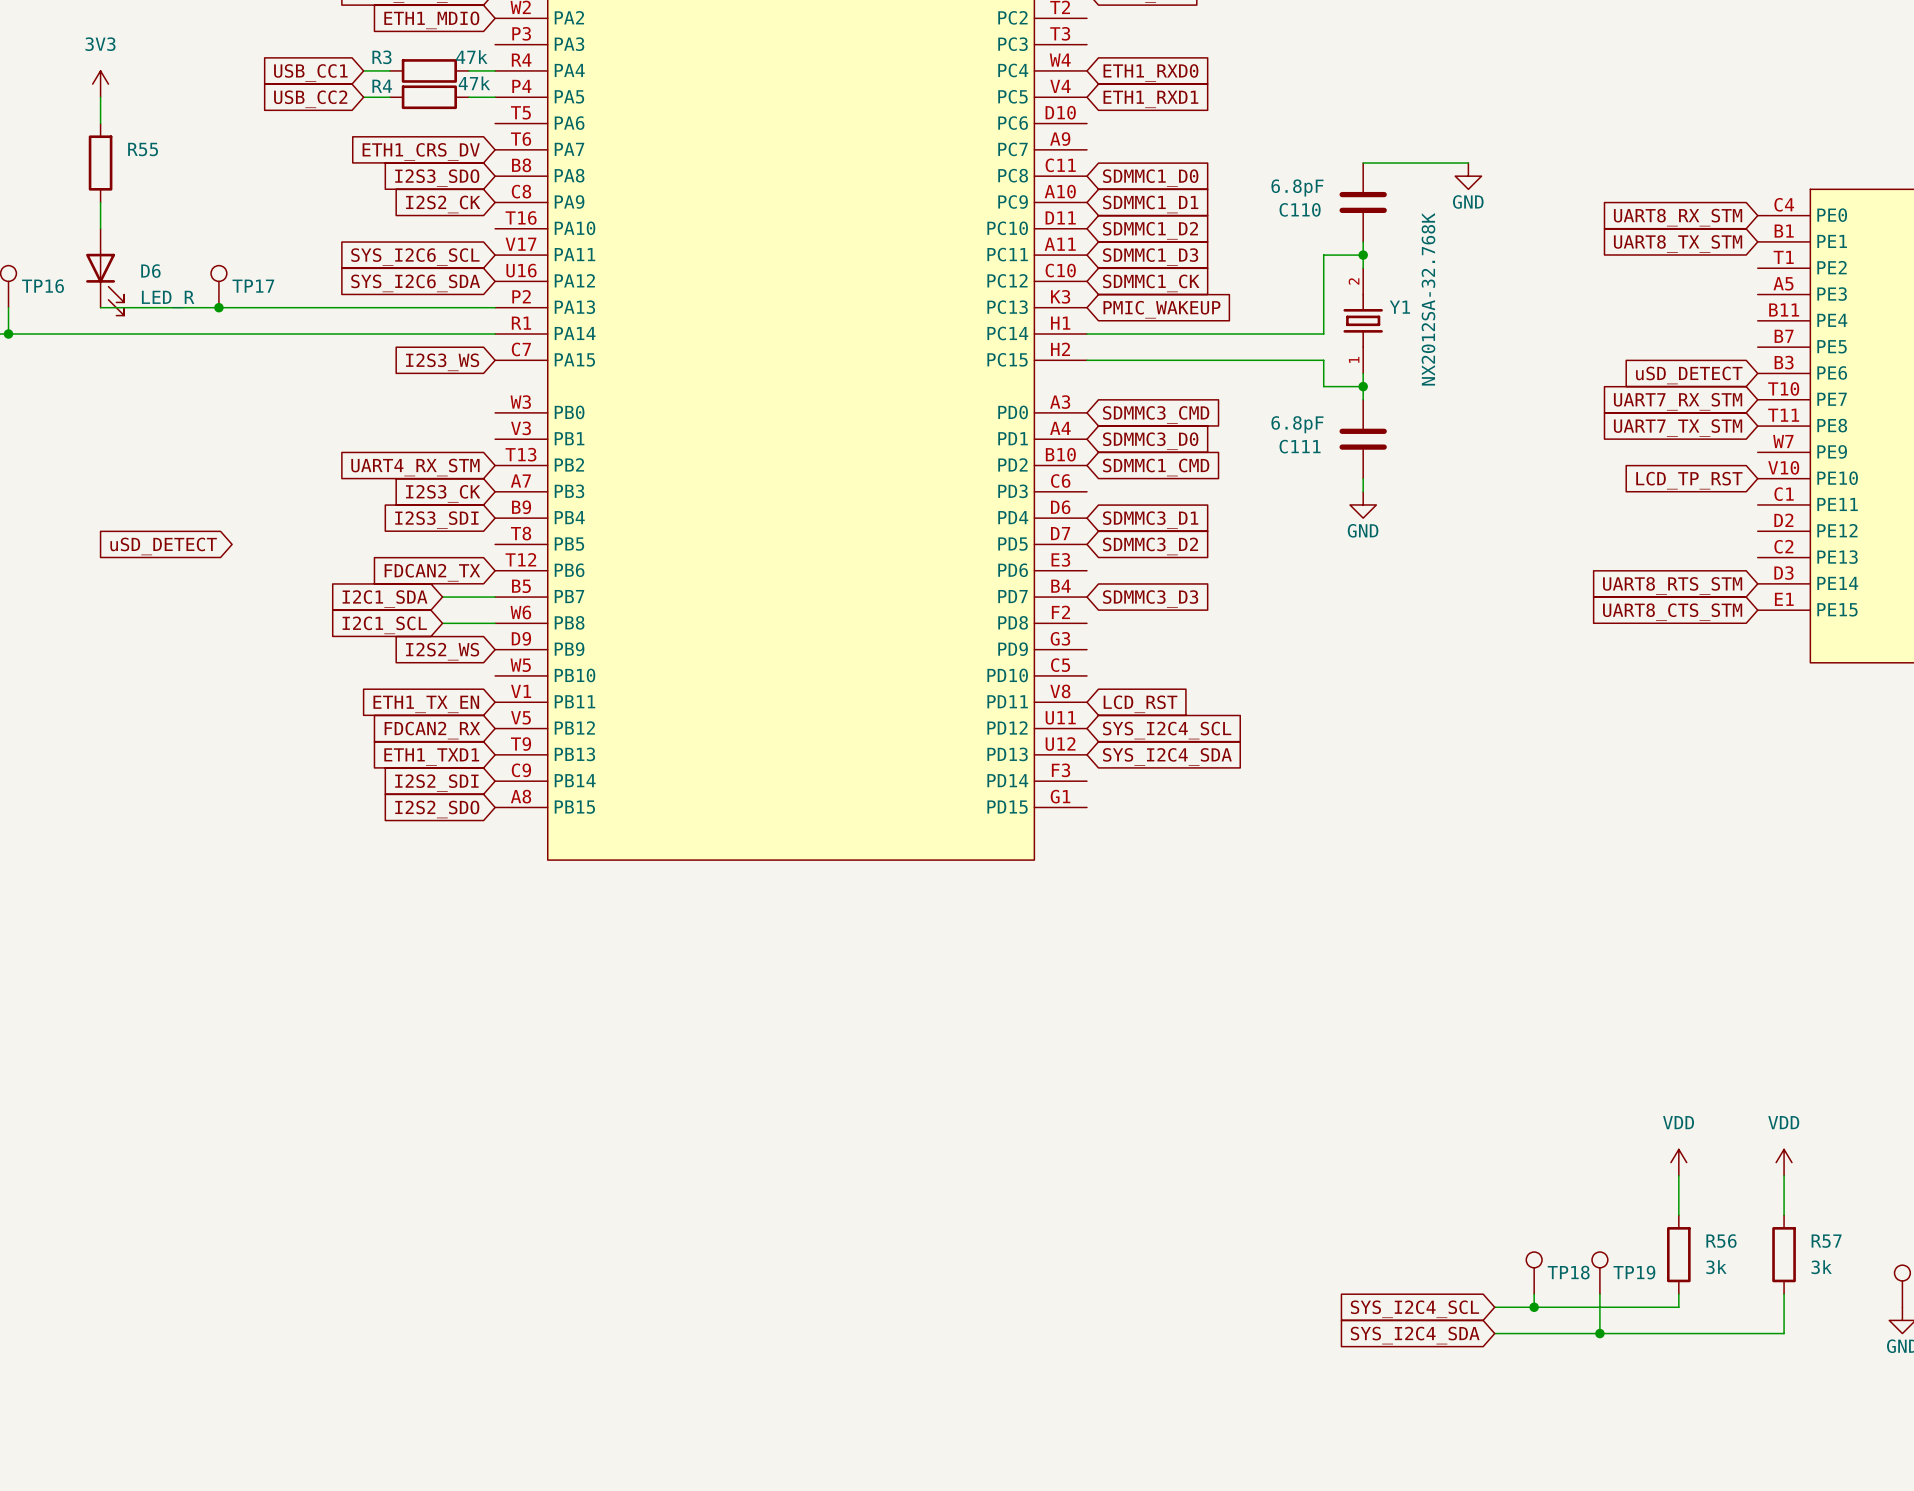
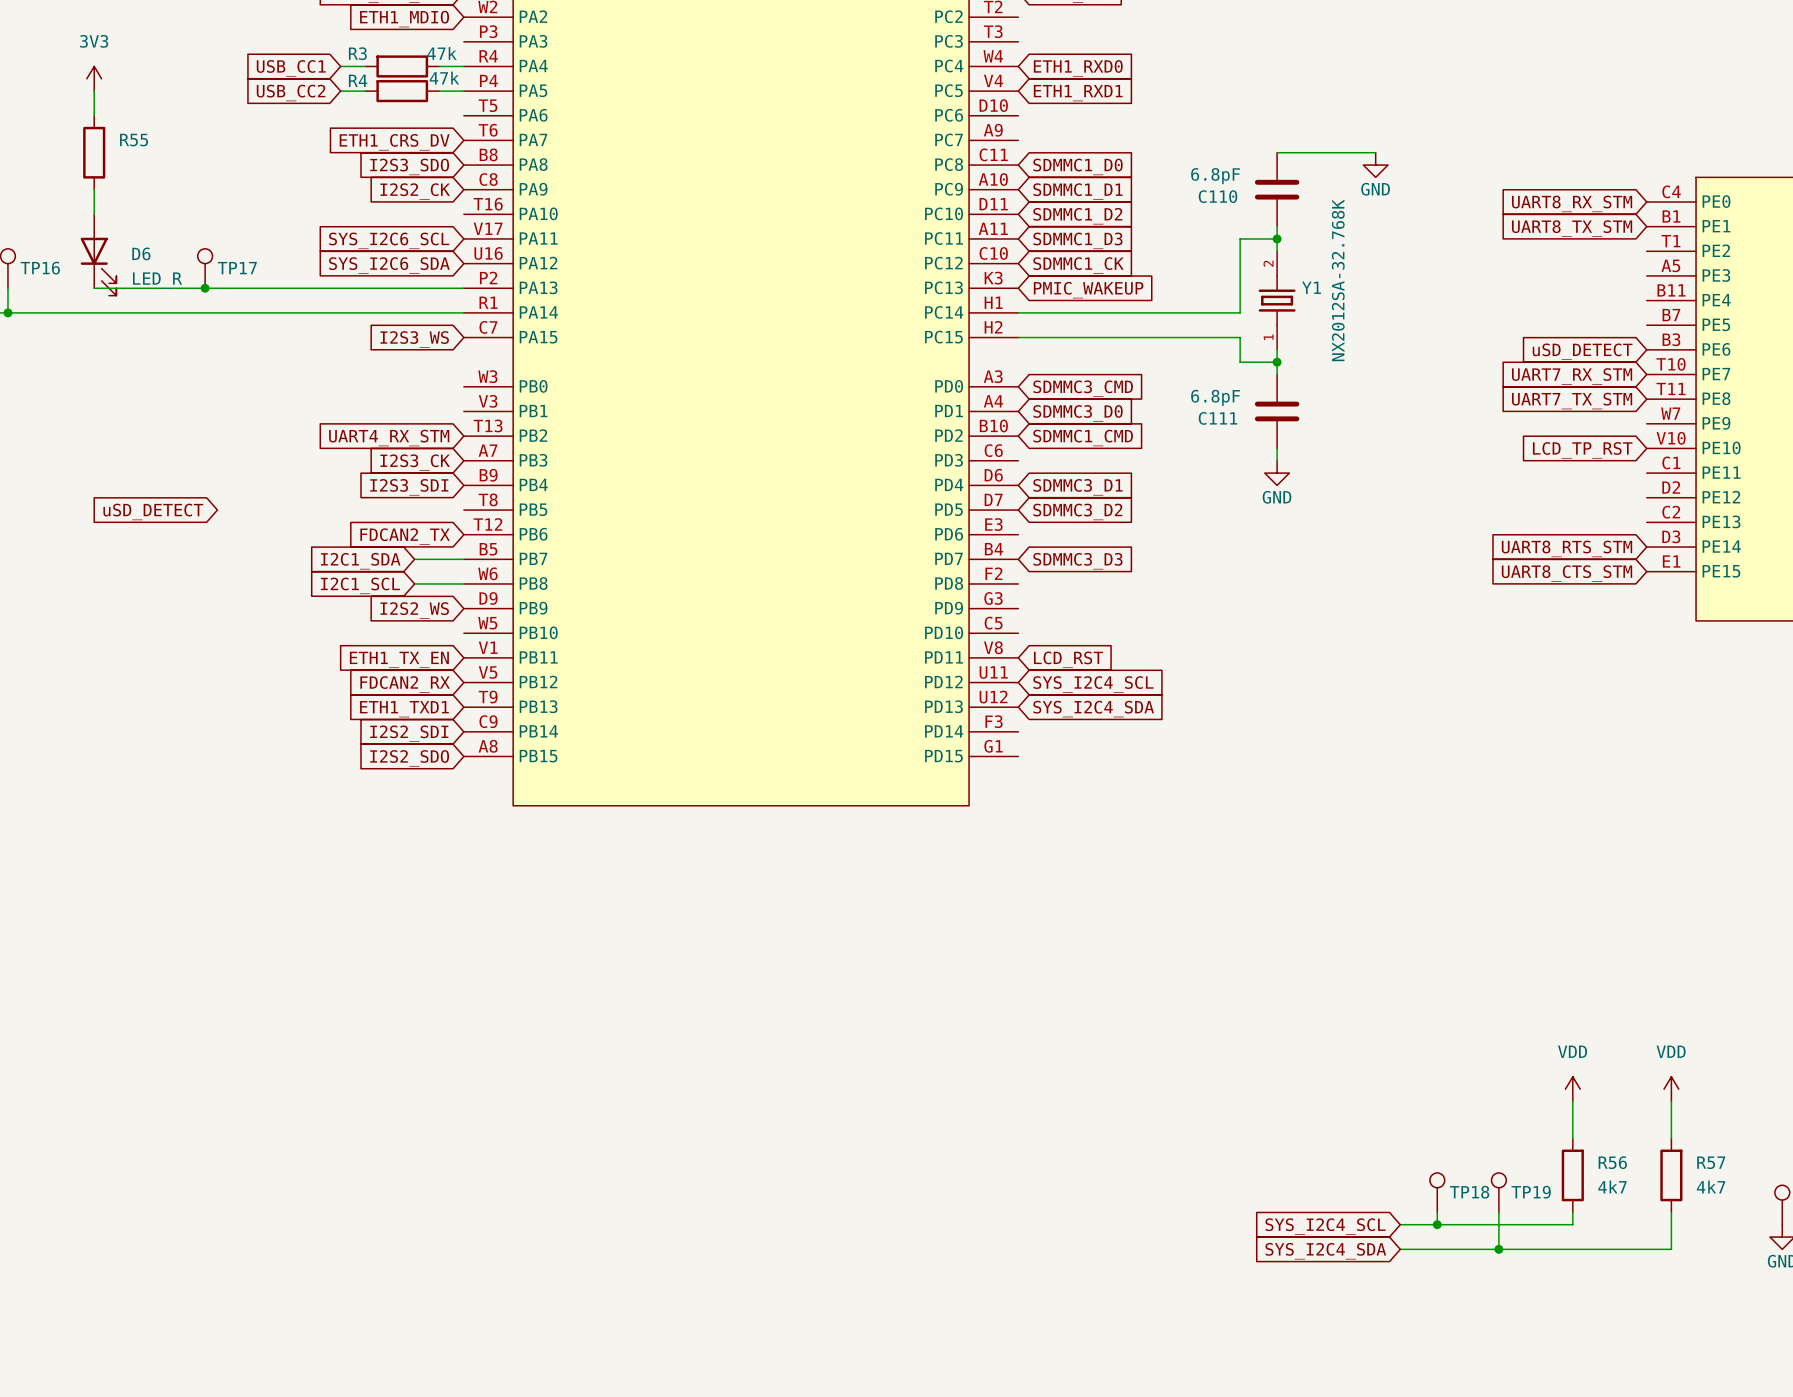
R56 value: 3k (1716, 1267) -> 4k7 (1612, 1187)
R57 value: 3k (1821, 1267) -> 4k7 (1711, 1187)

